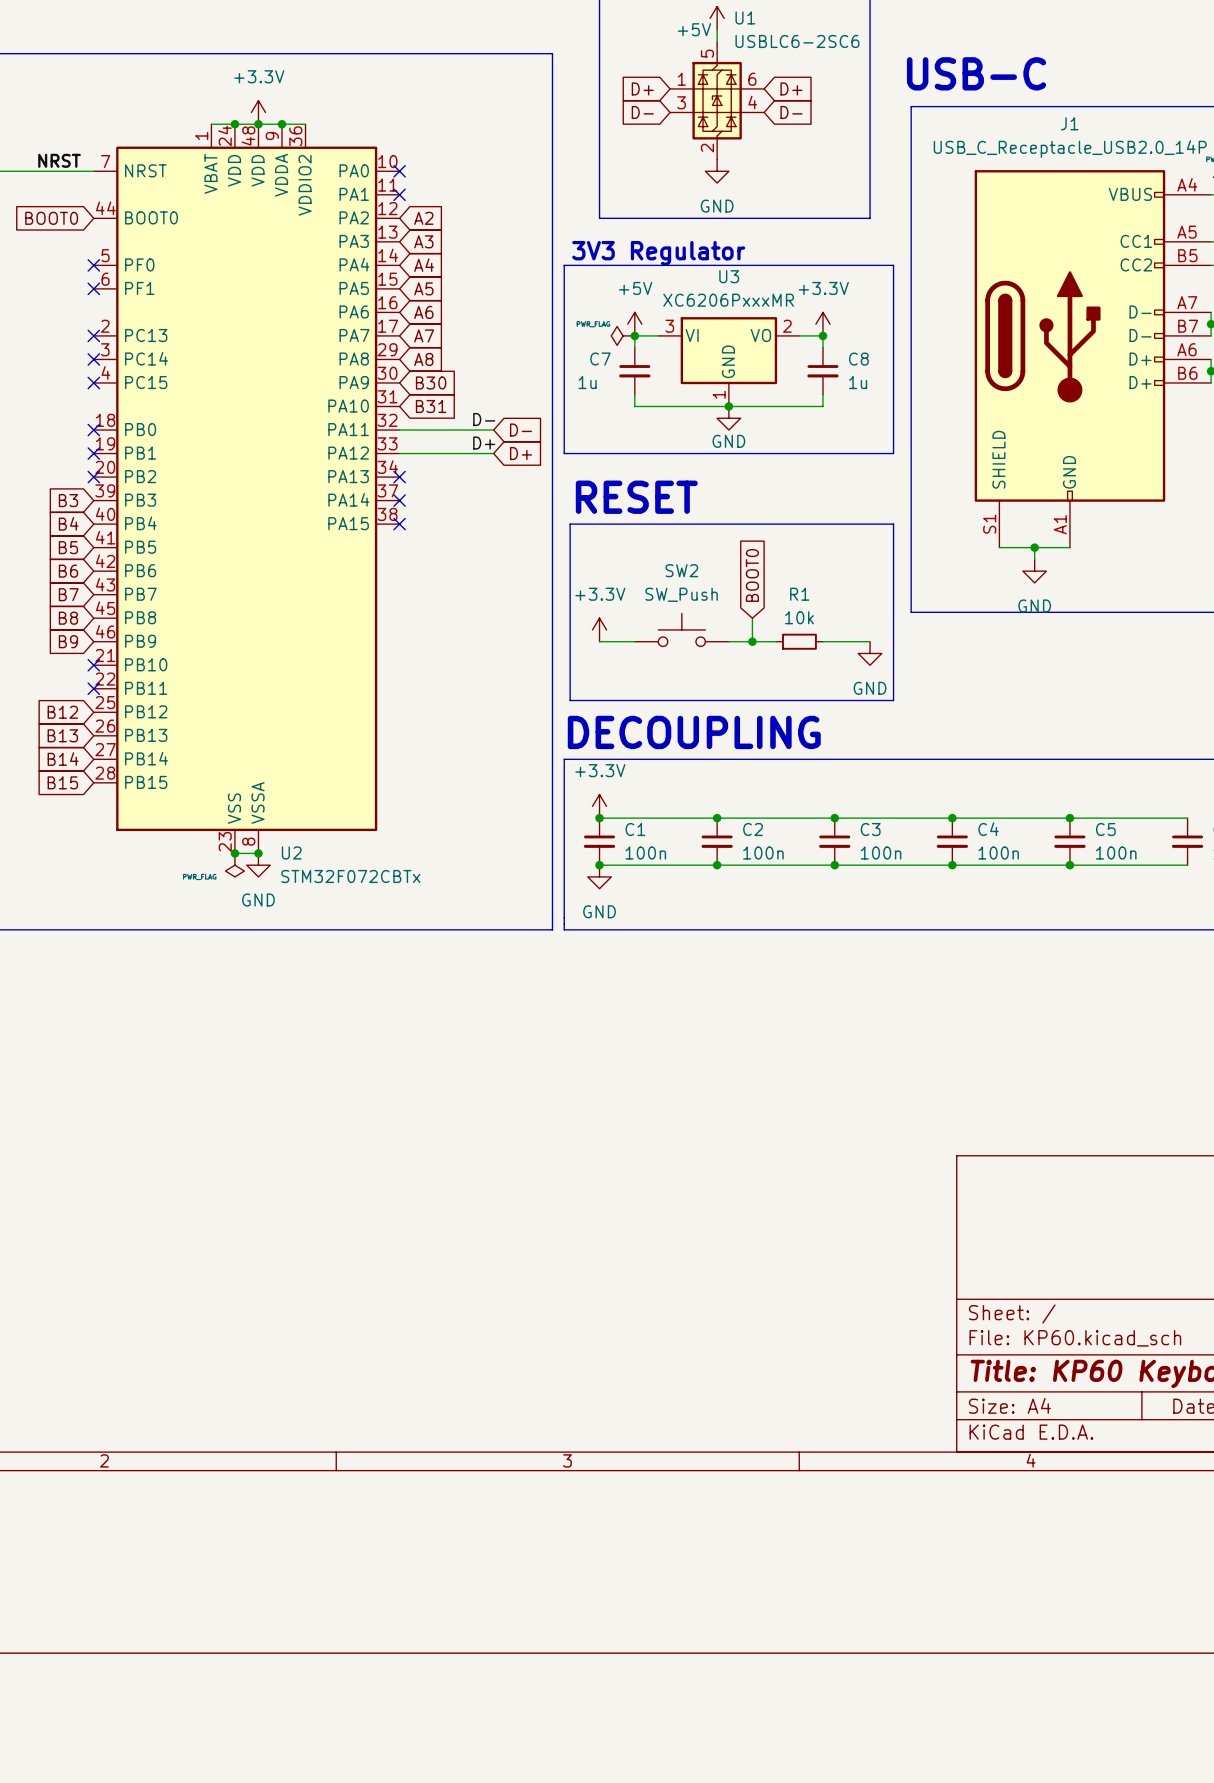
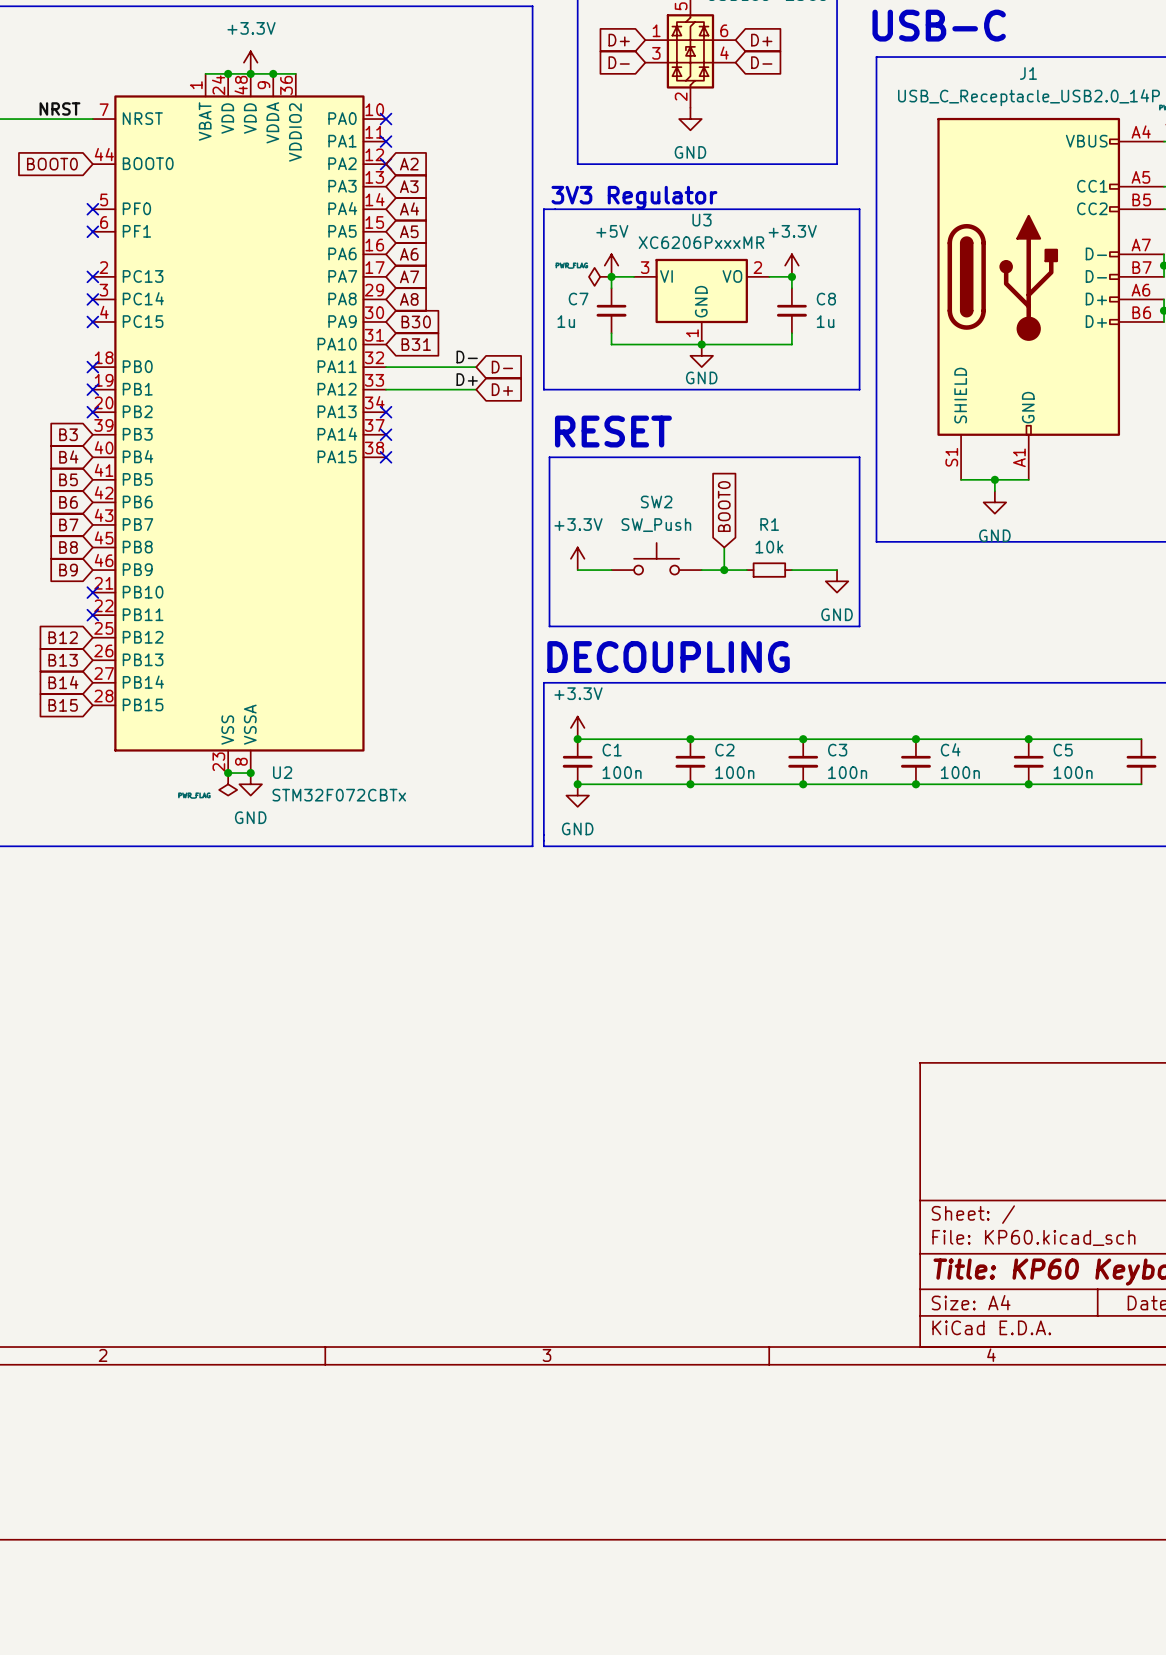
no-connect mark: none -> (386, 164)

